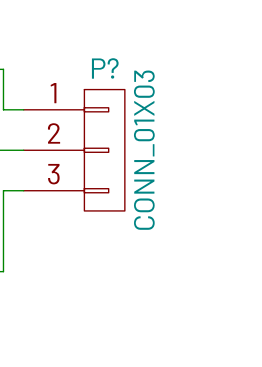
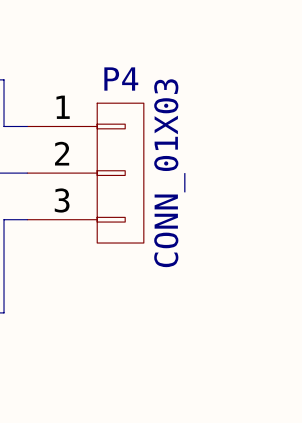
P? name: P? (105, 68) -> P4 (121, 79)

